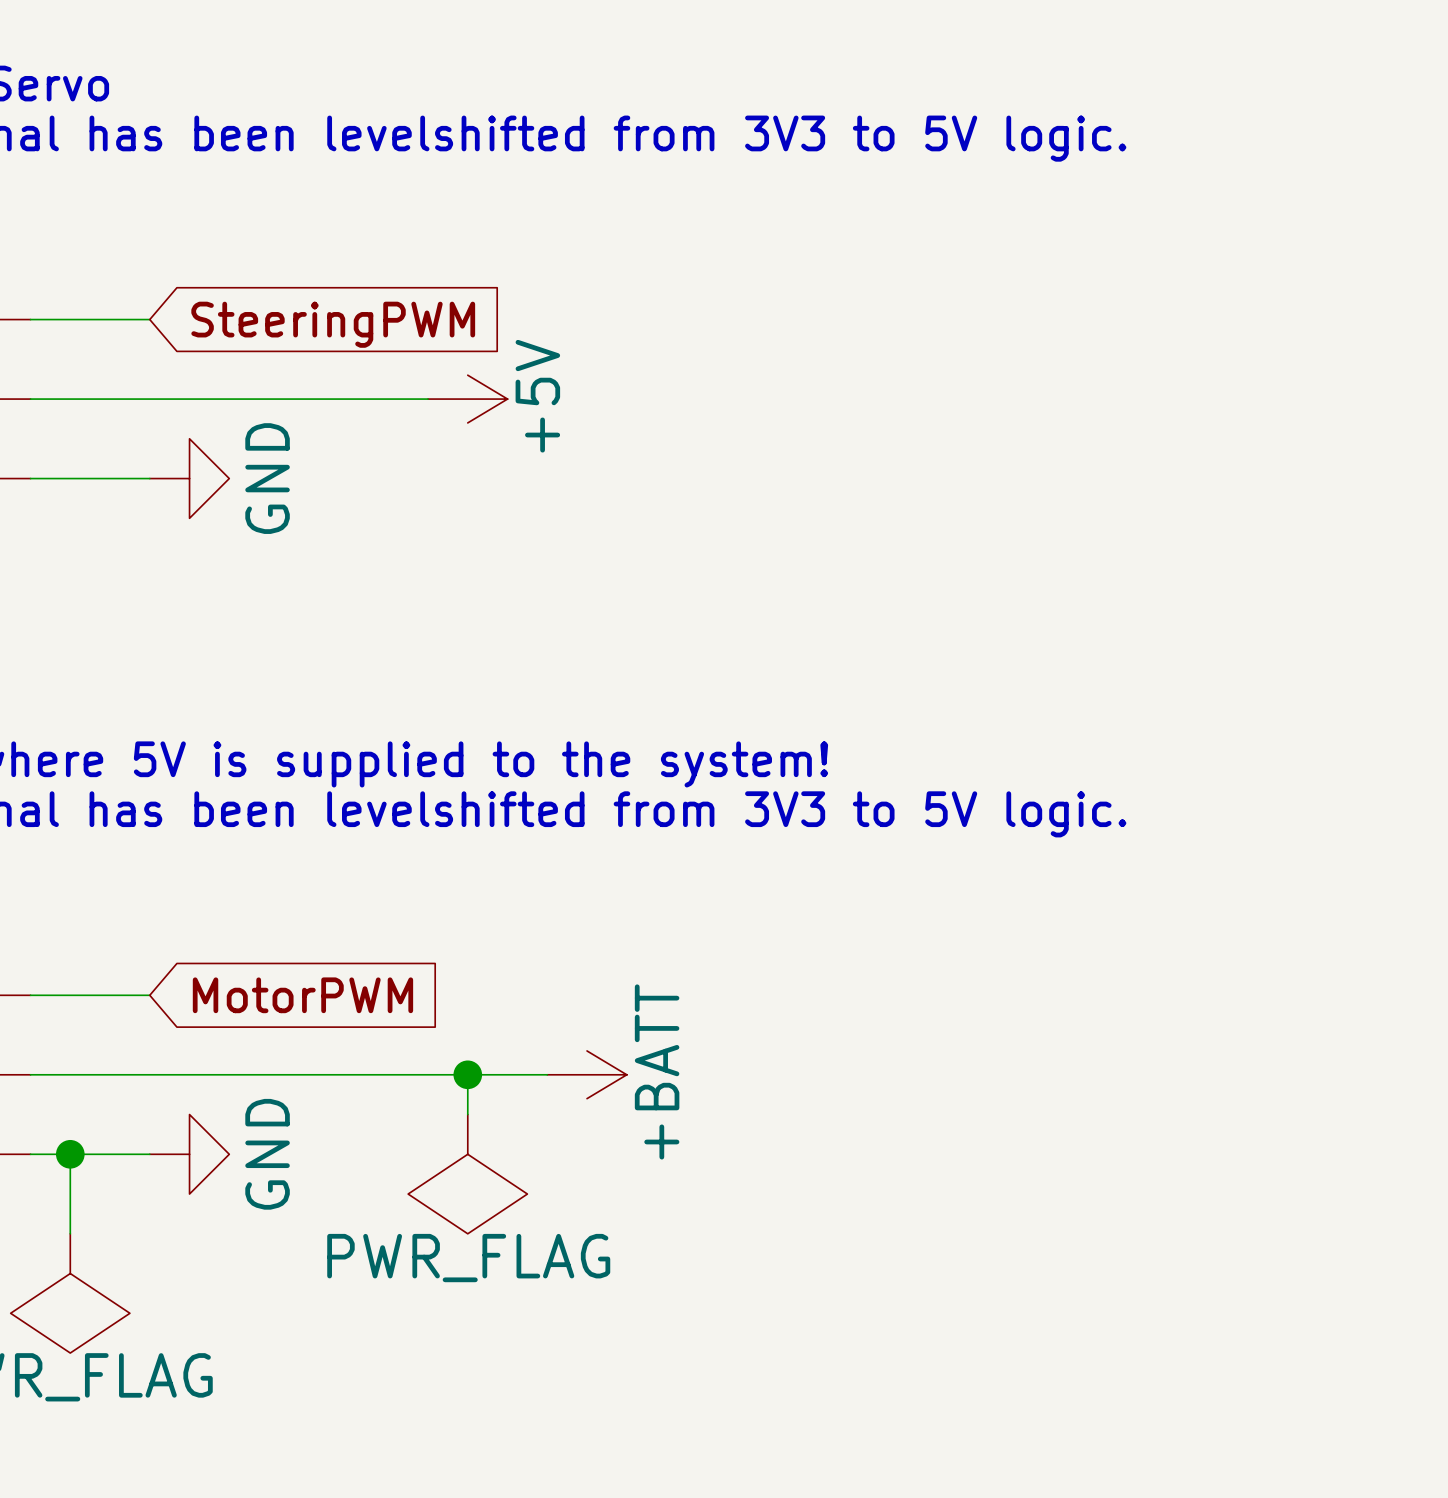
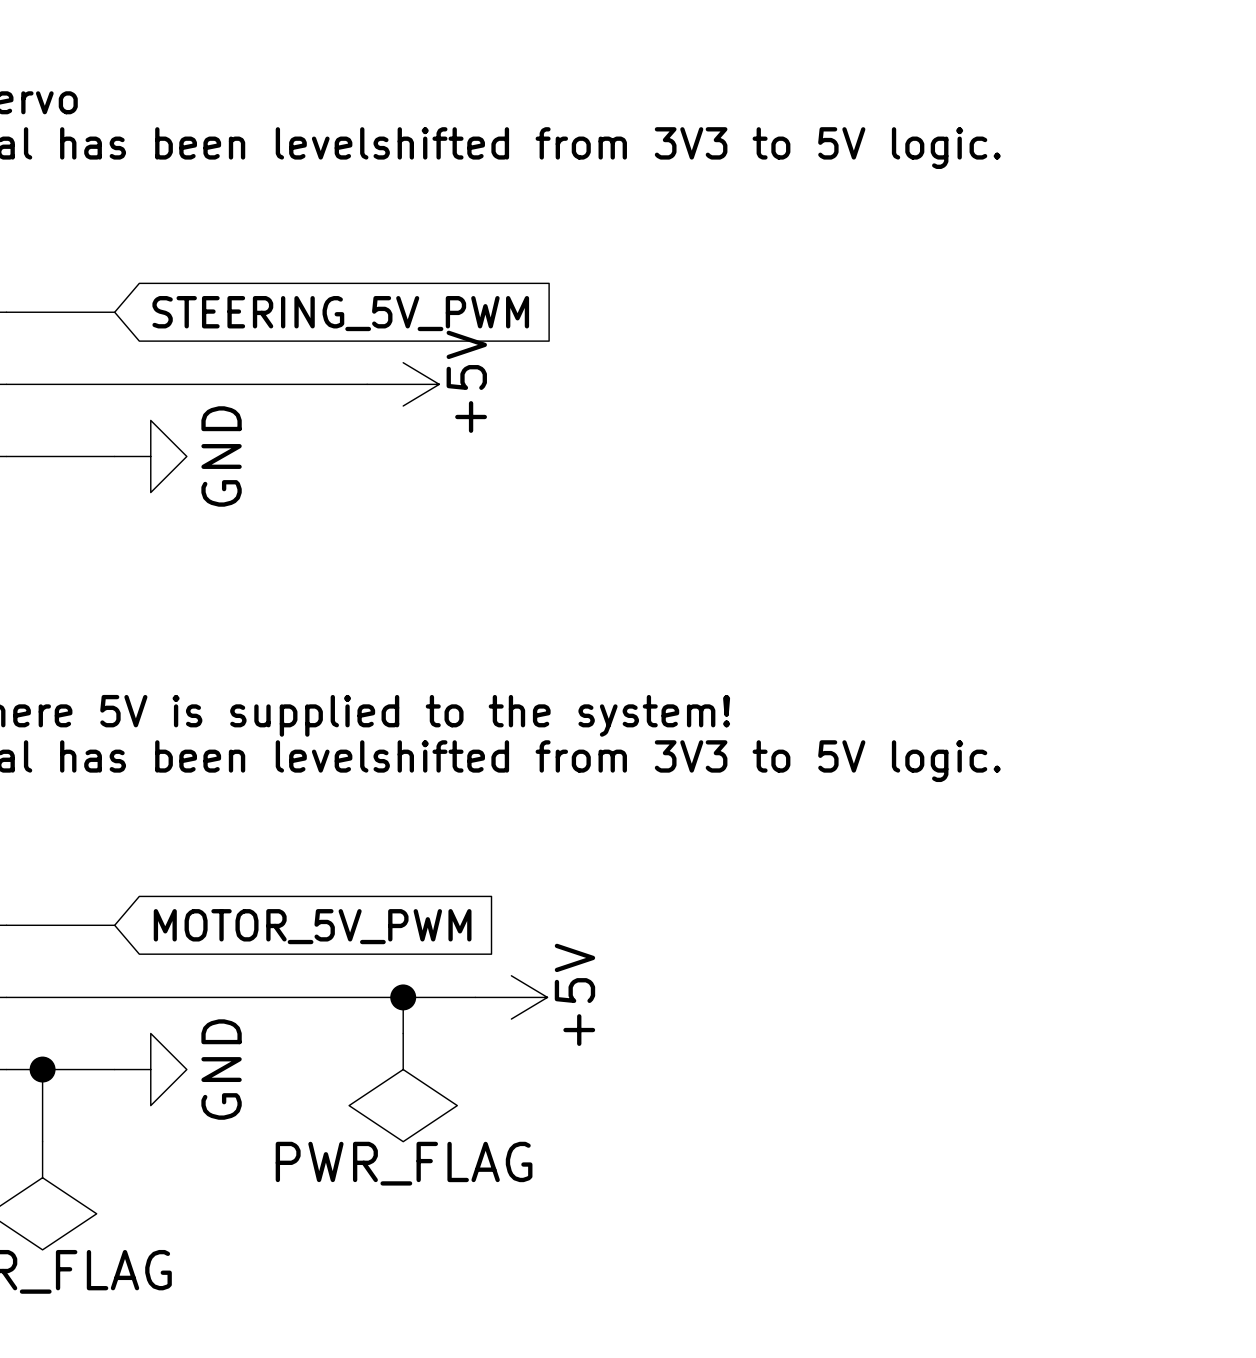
global label: SteeringPWM (333, 324) -> STEERING_5V_PWM (340, 313)
global label: MotorPWM (302, 995) -> MOTOR_5V_PWM (312, 926)
power symbol: +BATT (587, 1074) -> +5V (511, 997)

